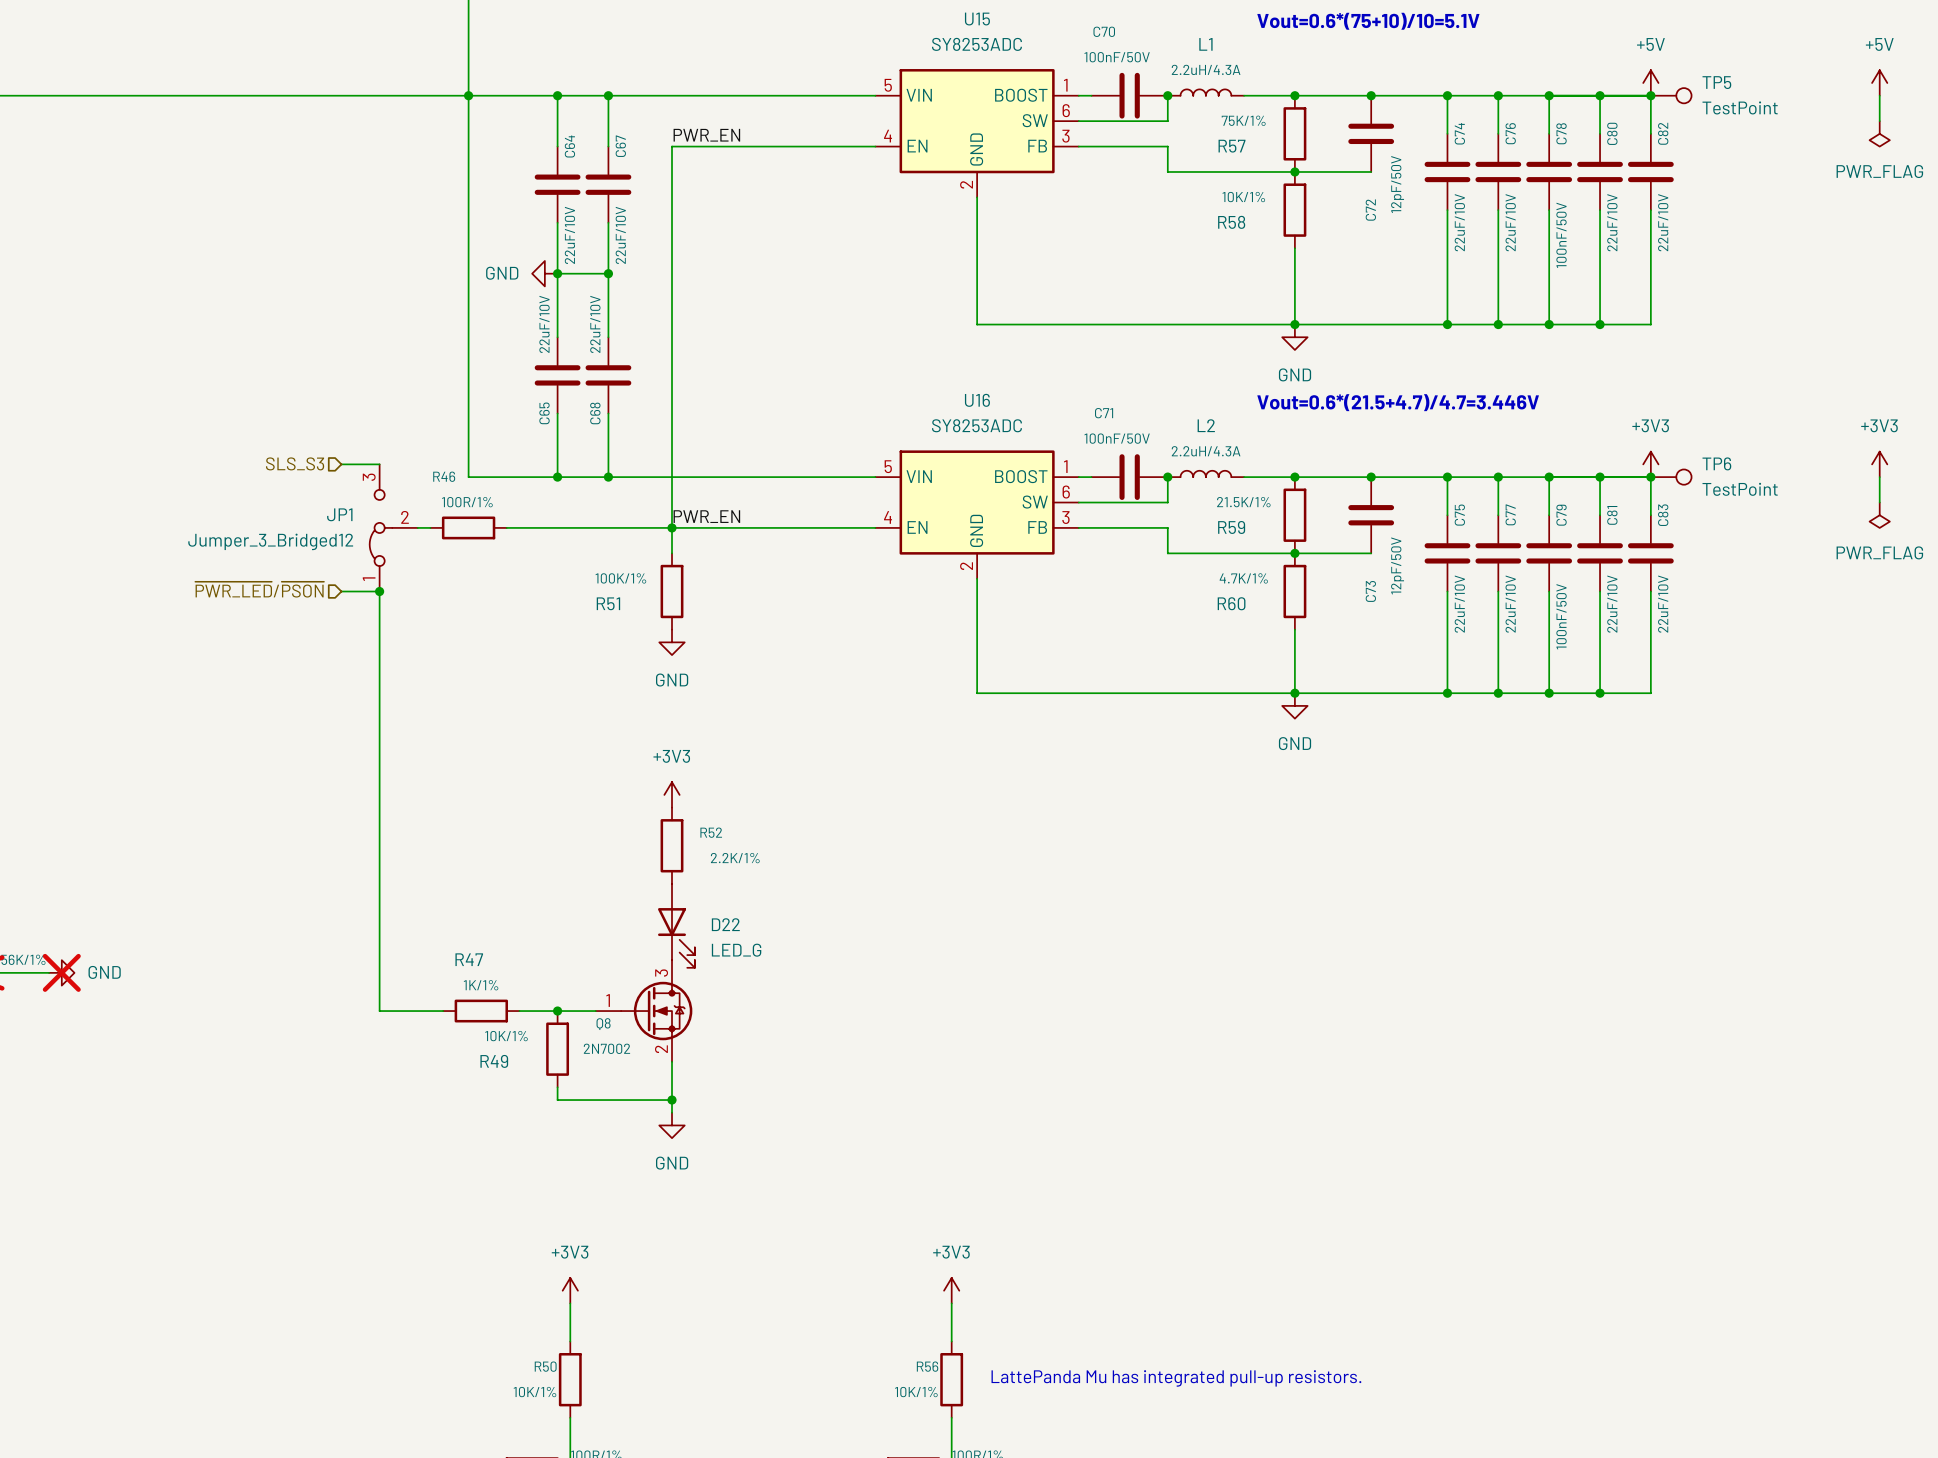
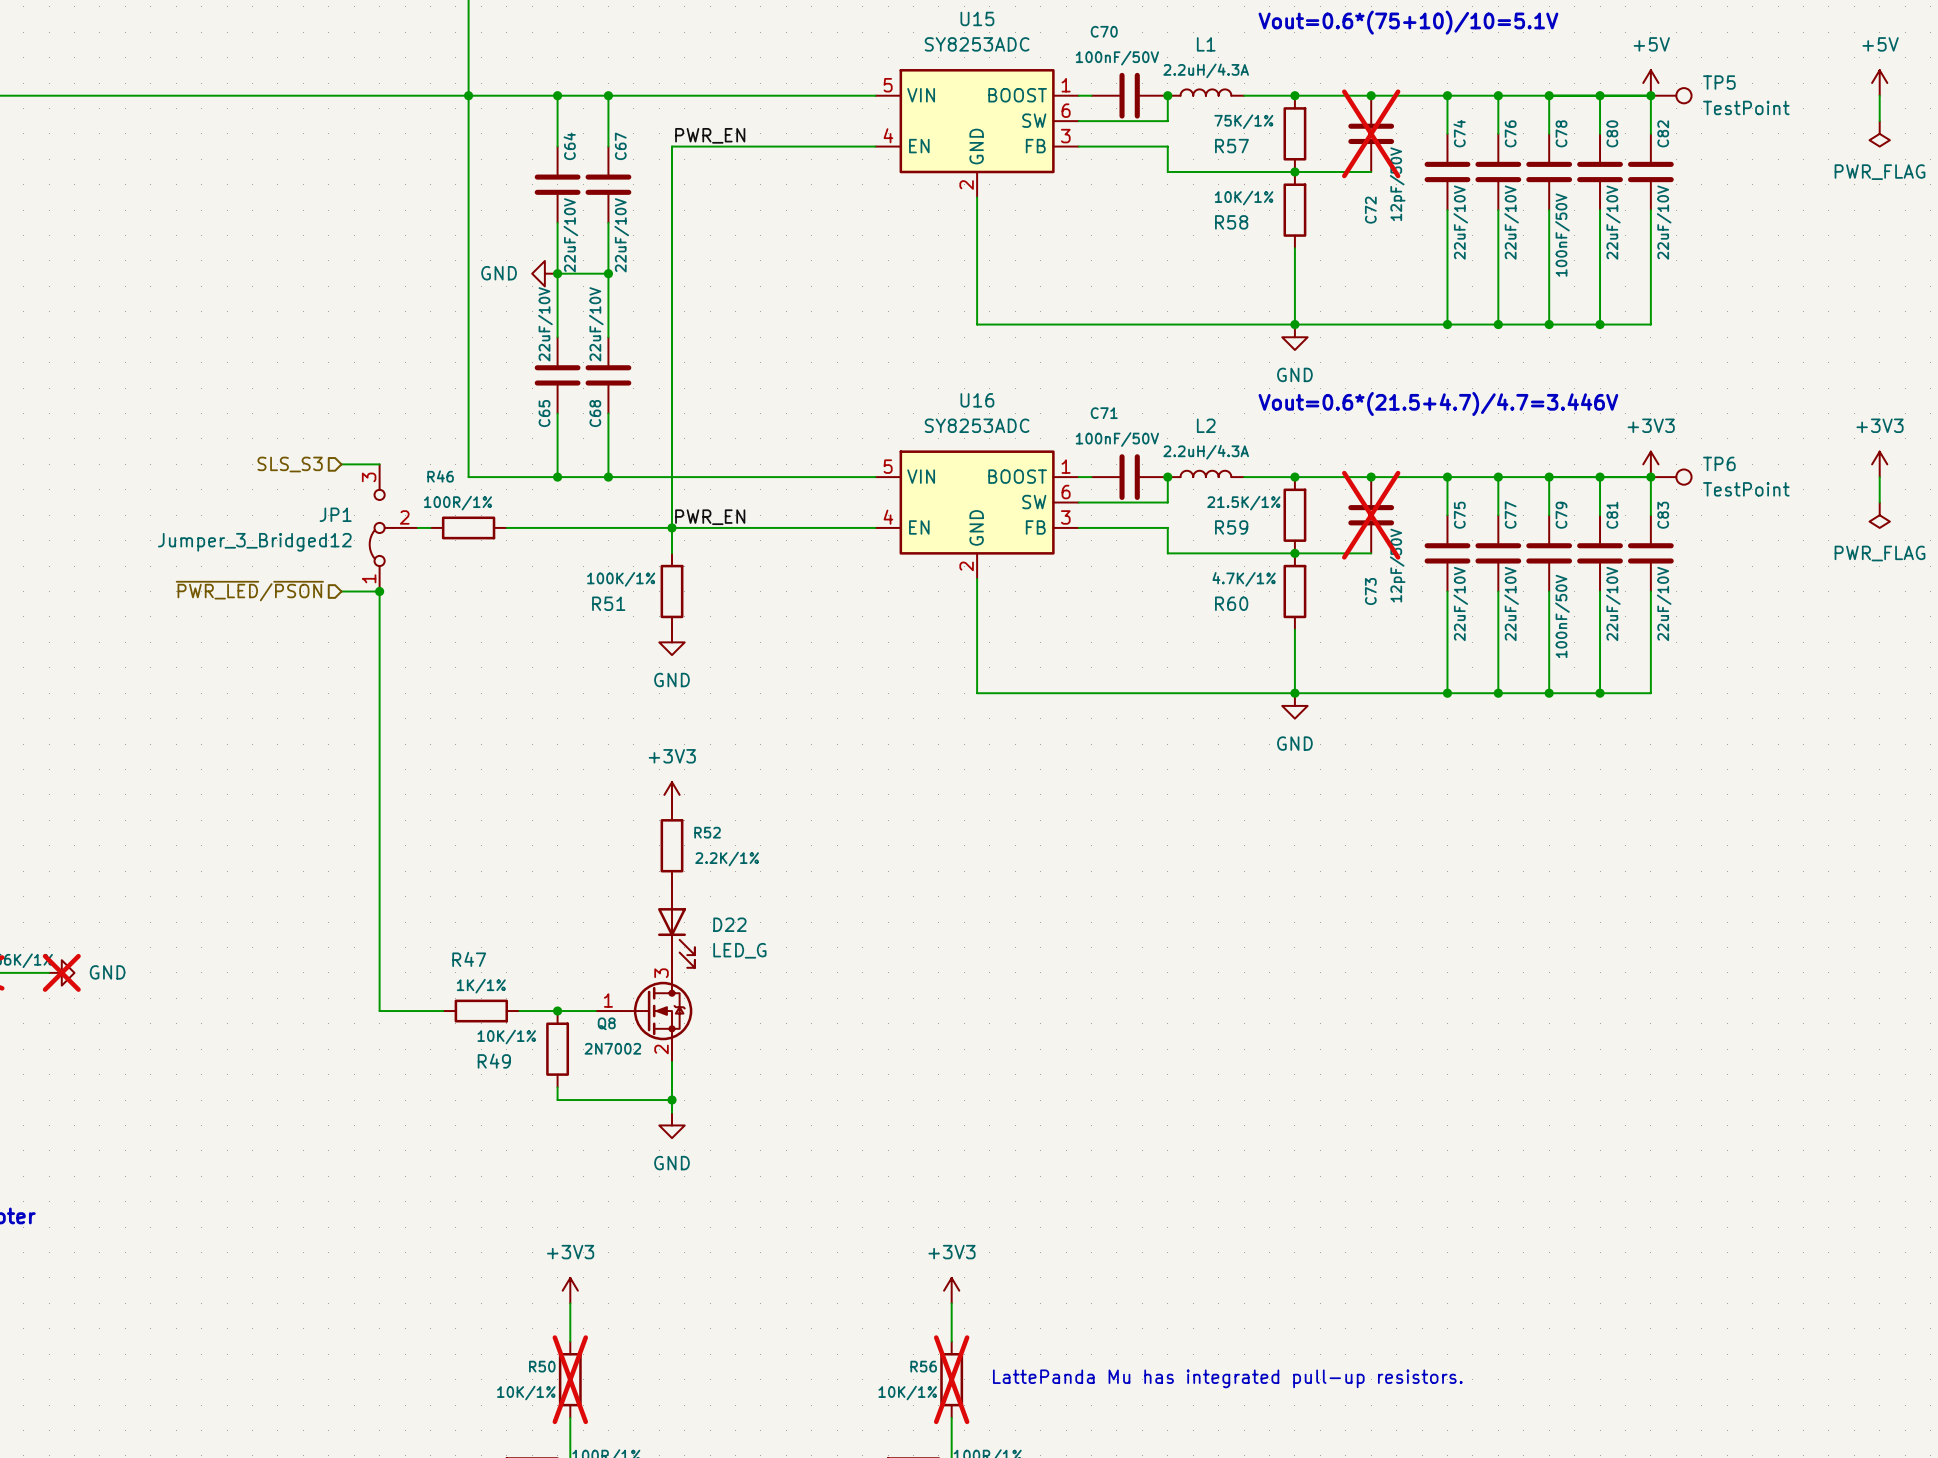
C72 do-not-place cross: none -> (1371, 133)
C73 do-not-place cross: none -> (1371, 515)
R50 do-not-place cross: none -> (570, 1379)
R56 do-not-place cross: none -> (951, 1379)

